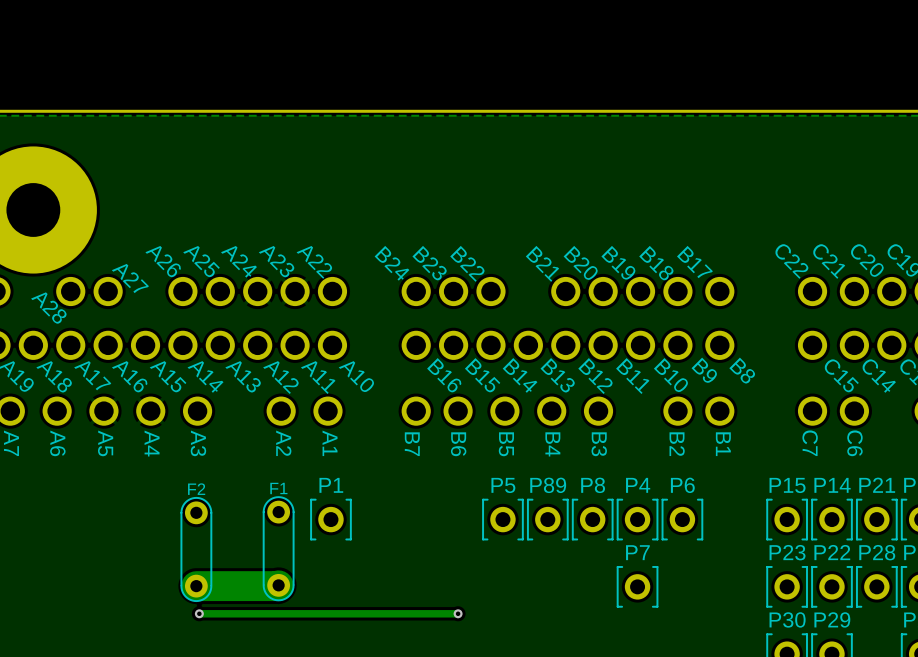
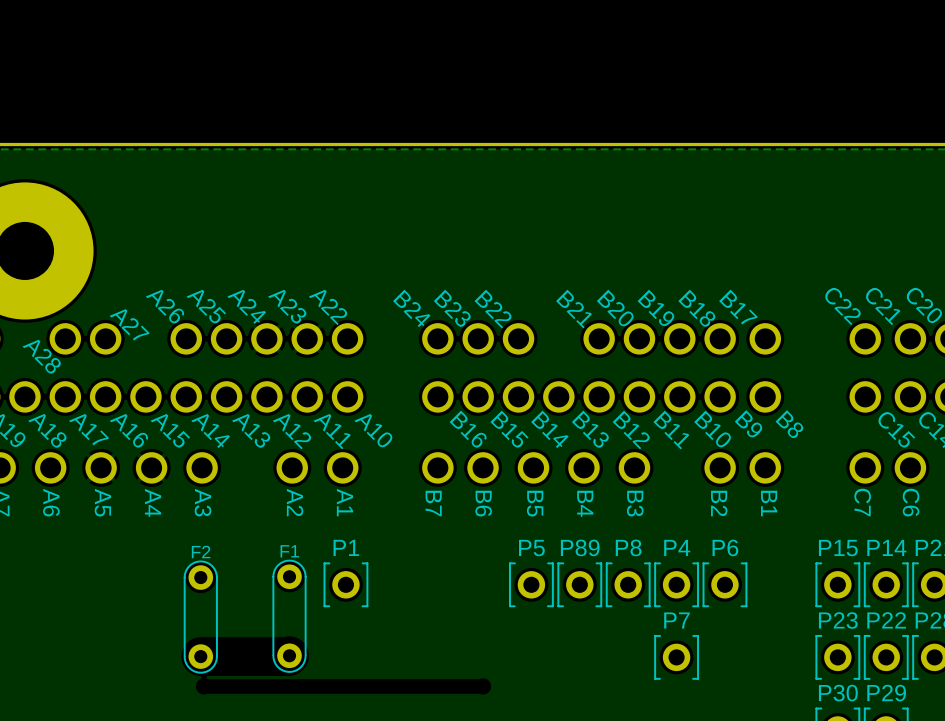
track: (278, 585) (196, 586) -> none
via: (199, 613) -> none
track: (458, 613) (199, 613) -> none
via: (458, 613) -> none

